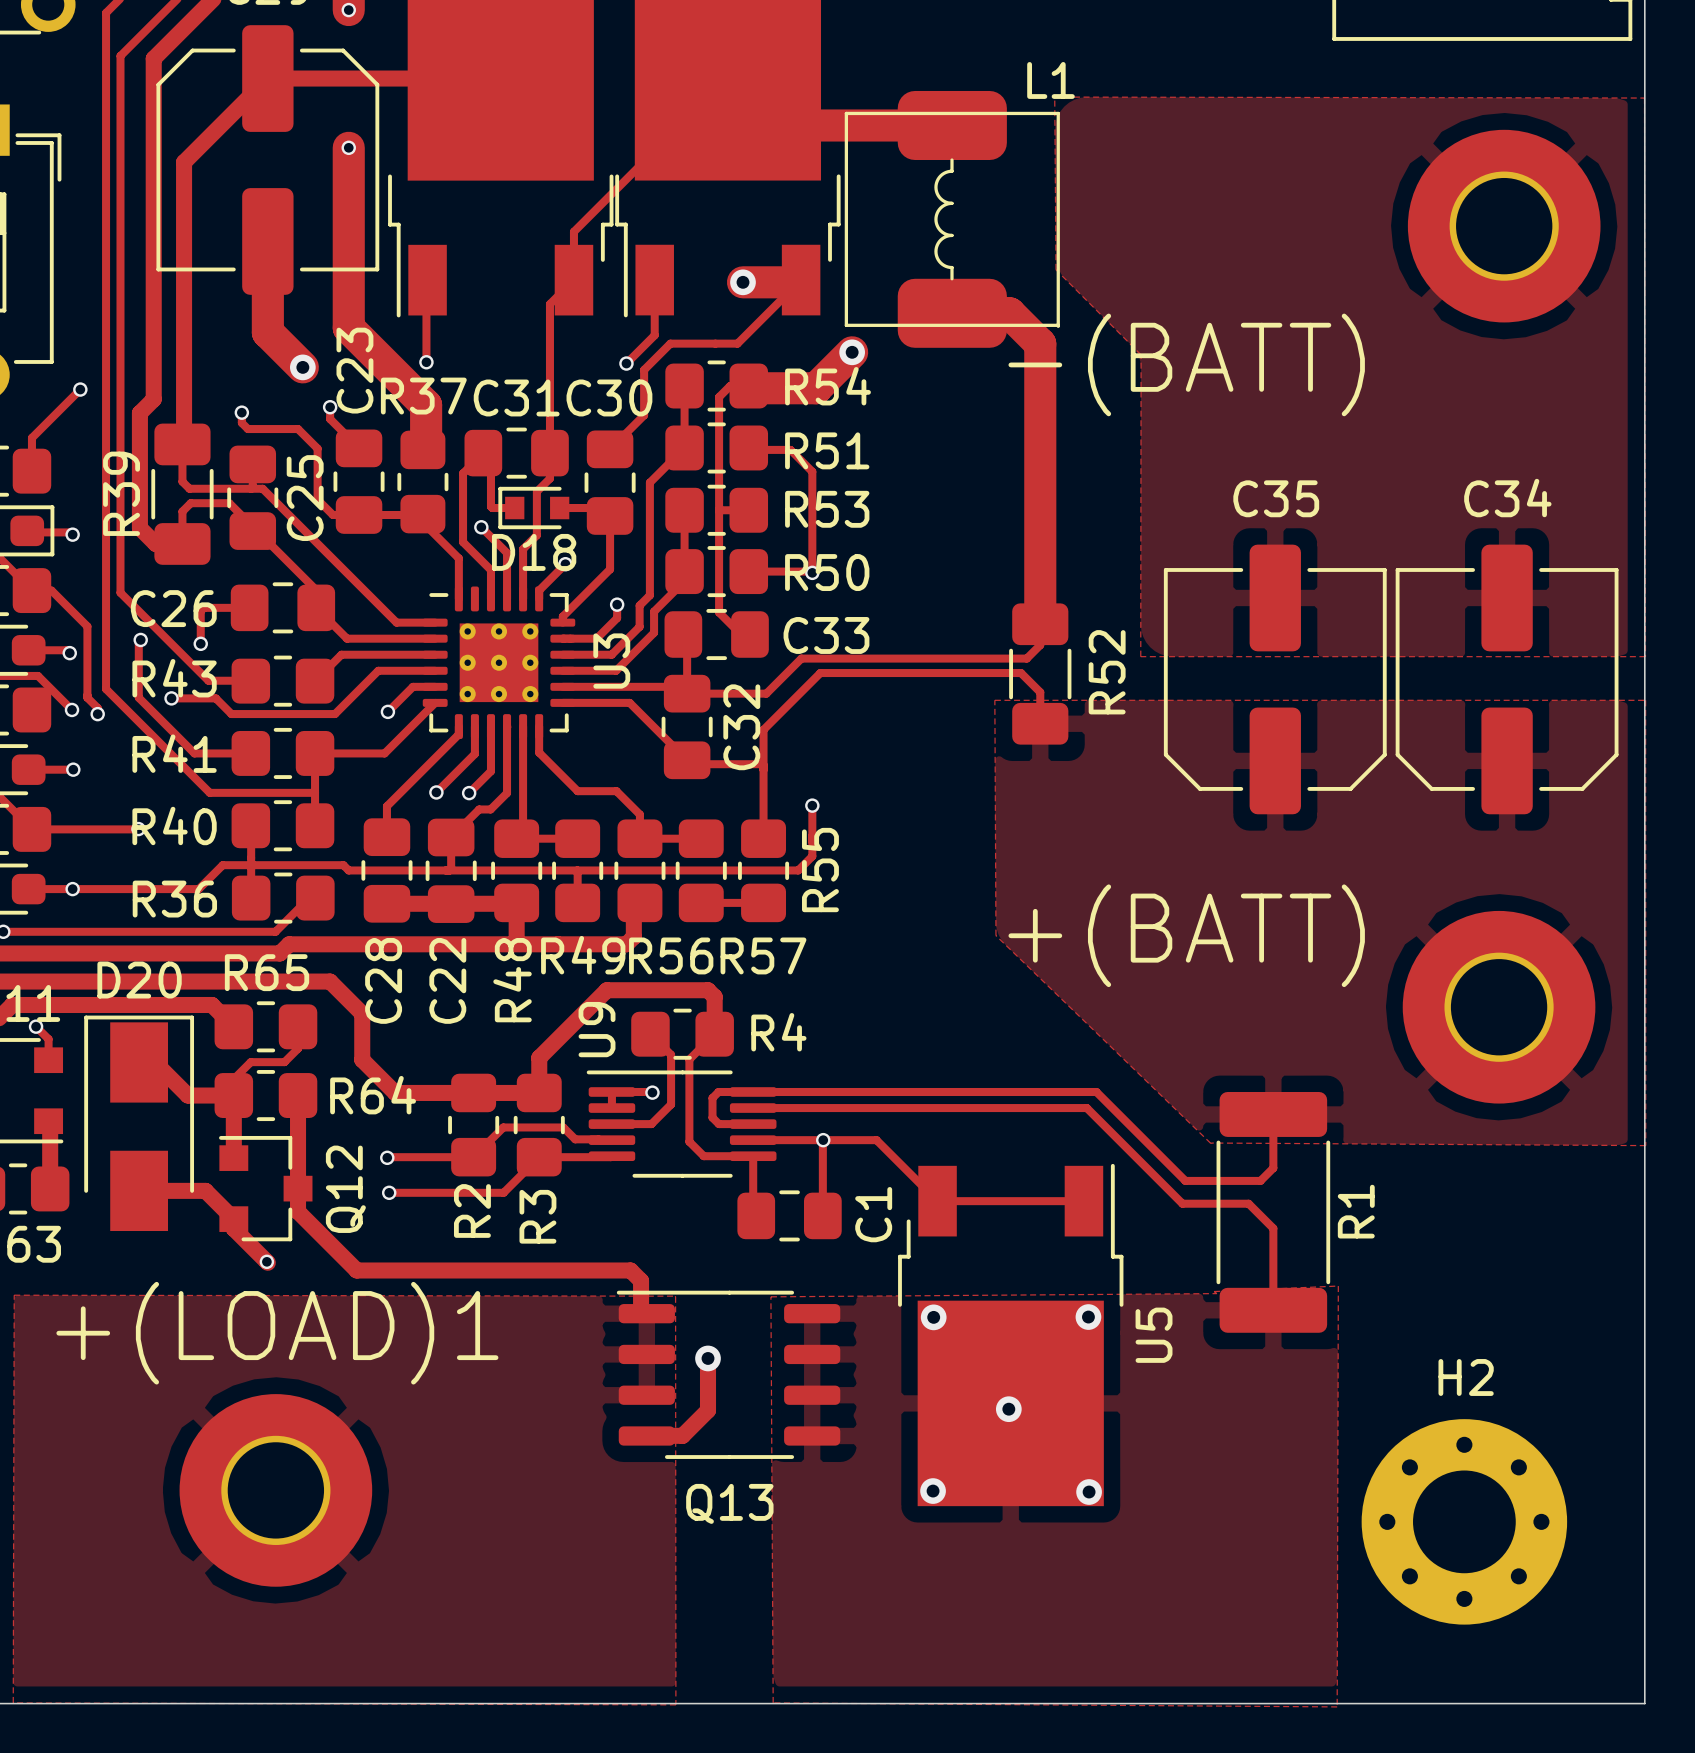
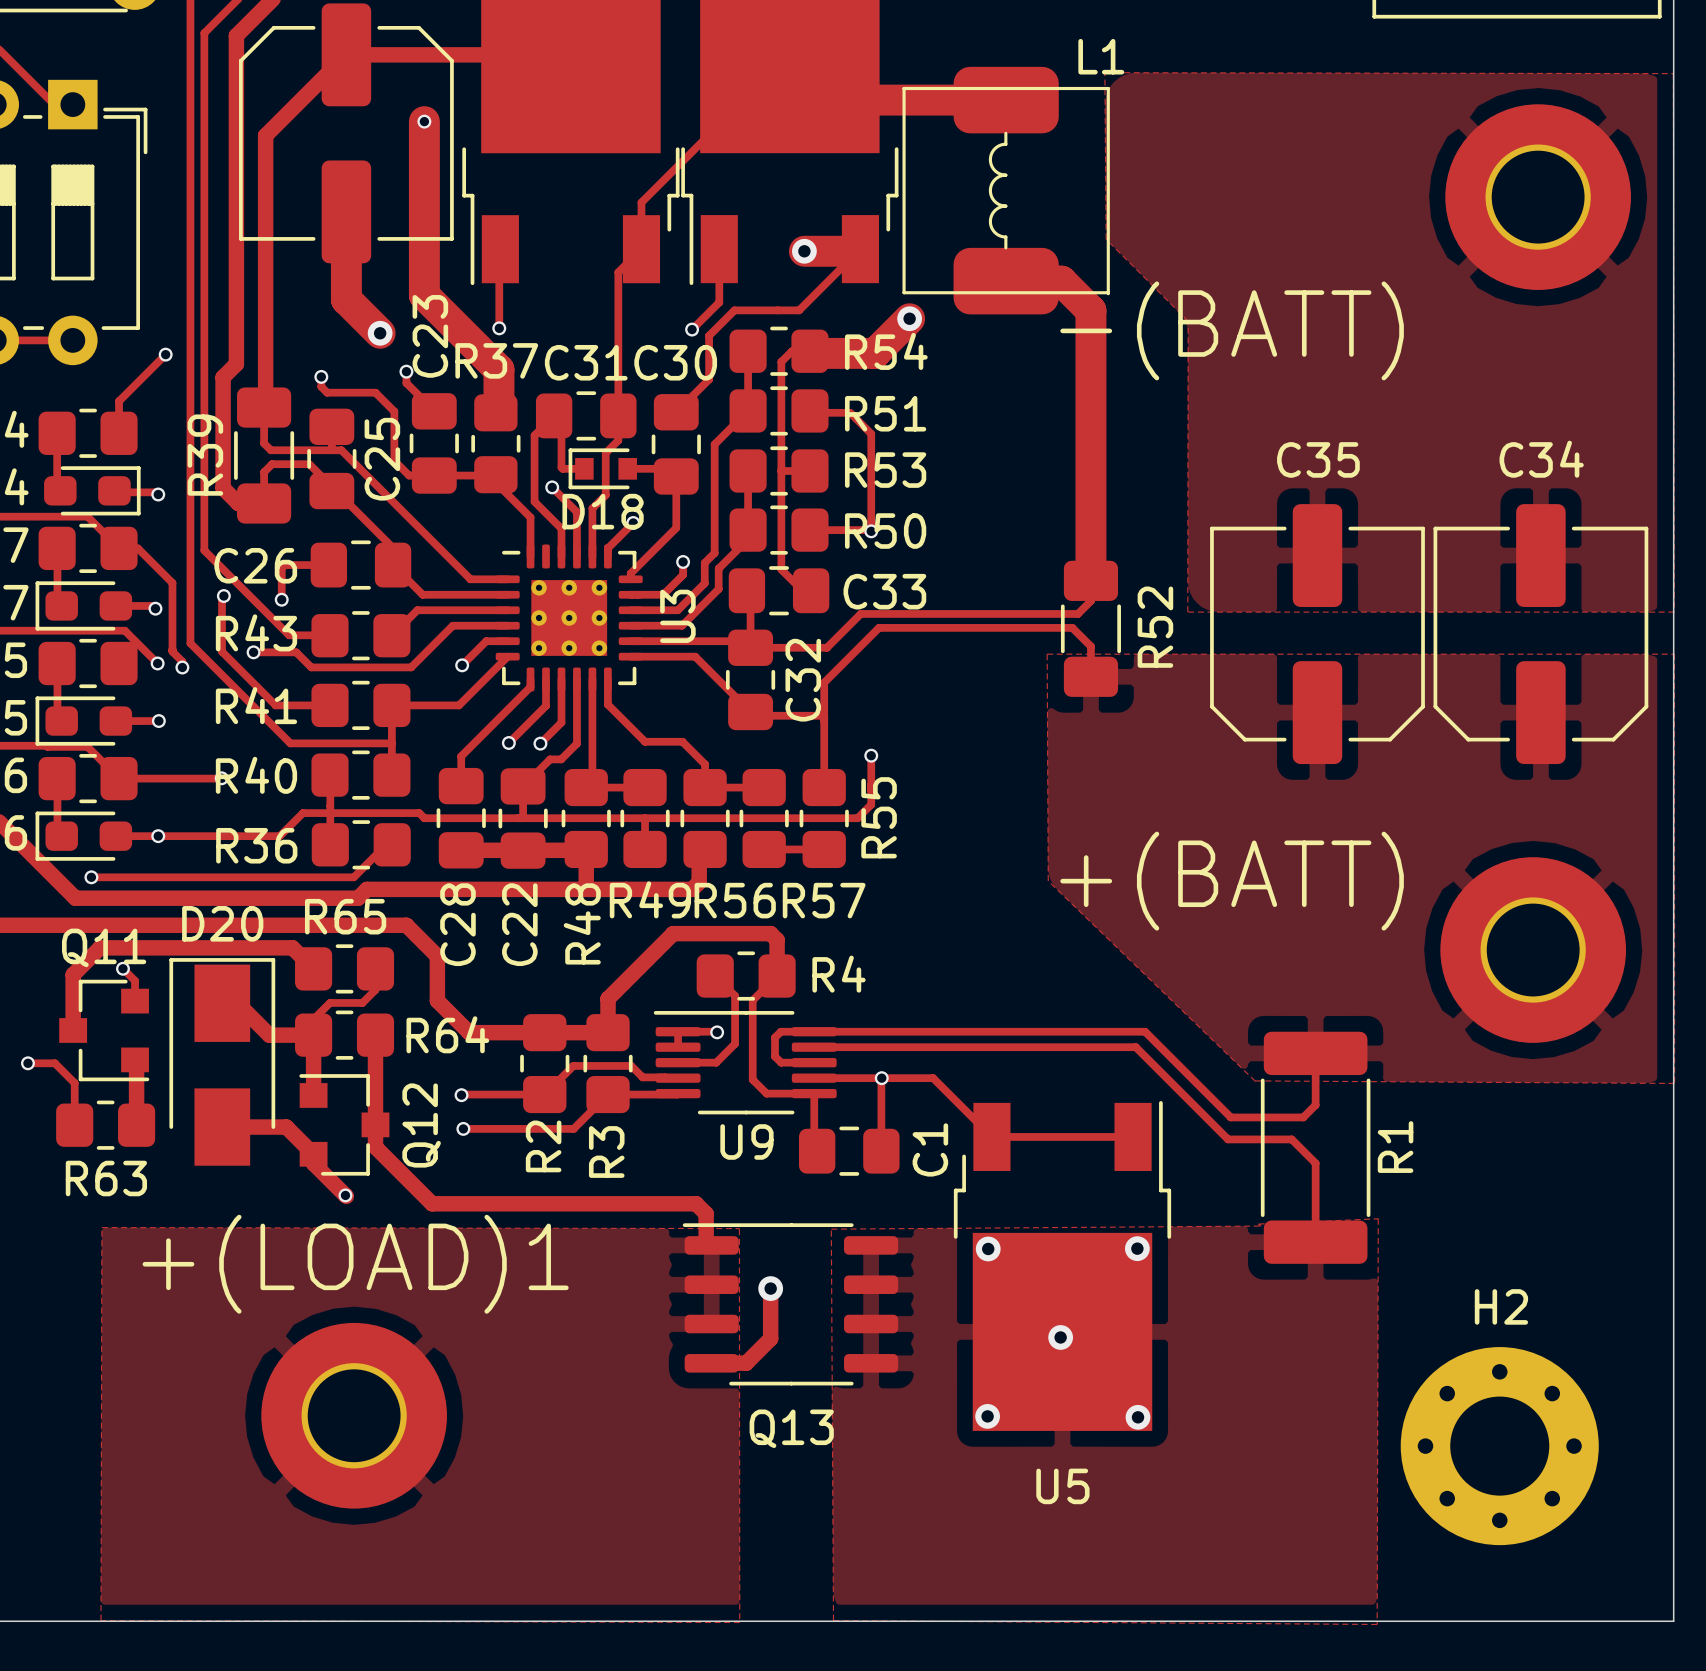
U9 name rotation: 0° (597, 1029) -> 90° clockwise (746, 1141)
U9 name position: U9 (597, 1029) -> U9 (746, 1141)
U5 name rotation: 0° (1154, 1335) -> 90° clockwise (1062, 1486)
U5 name position: U5 (1154, 1335) -> U5 (1062, 1486)

